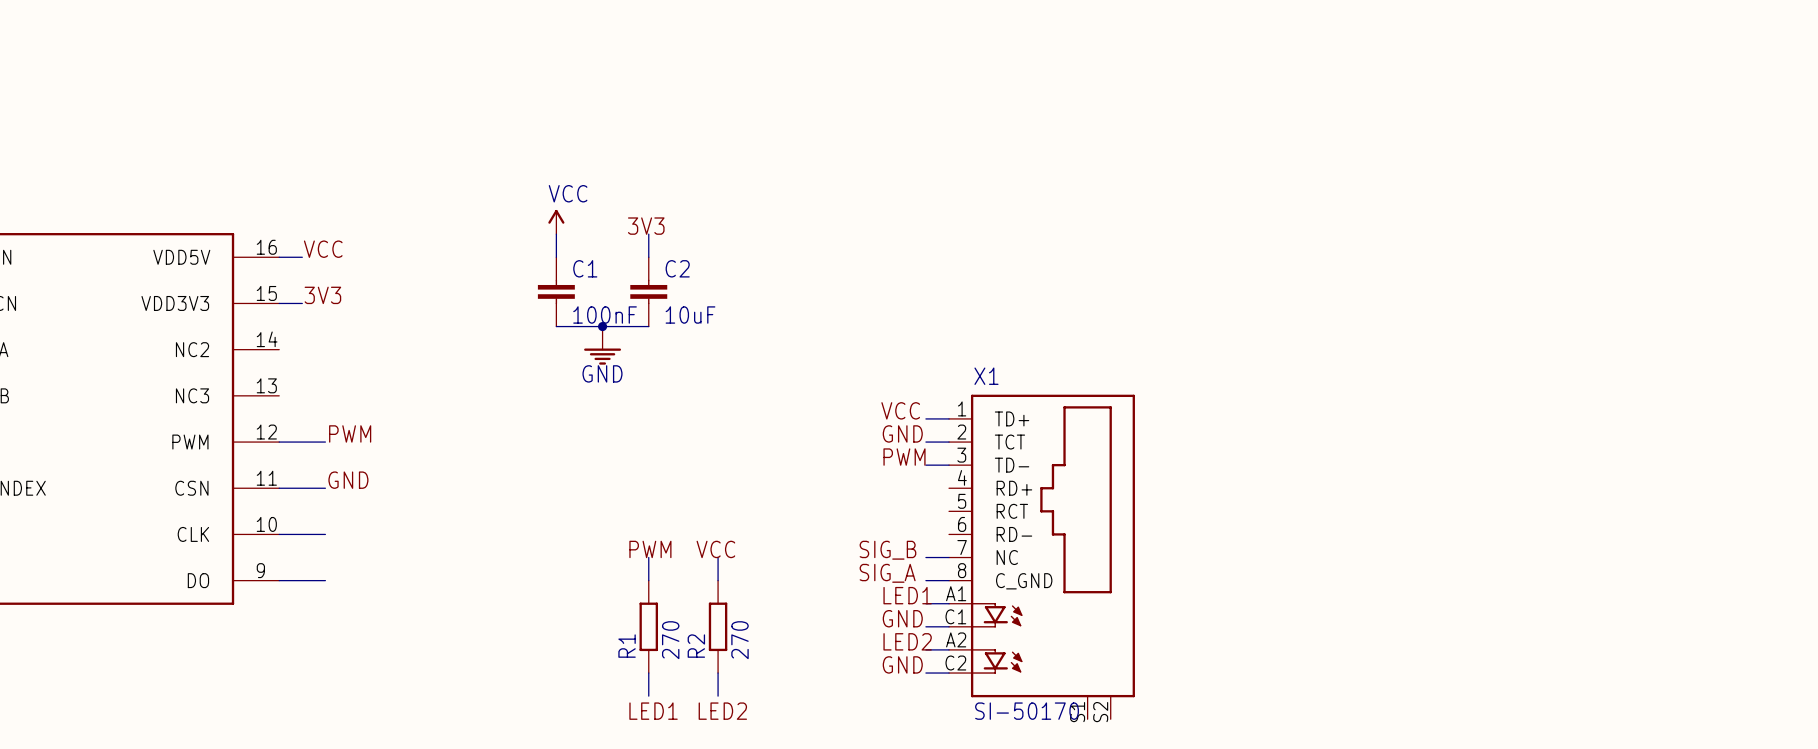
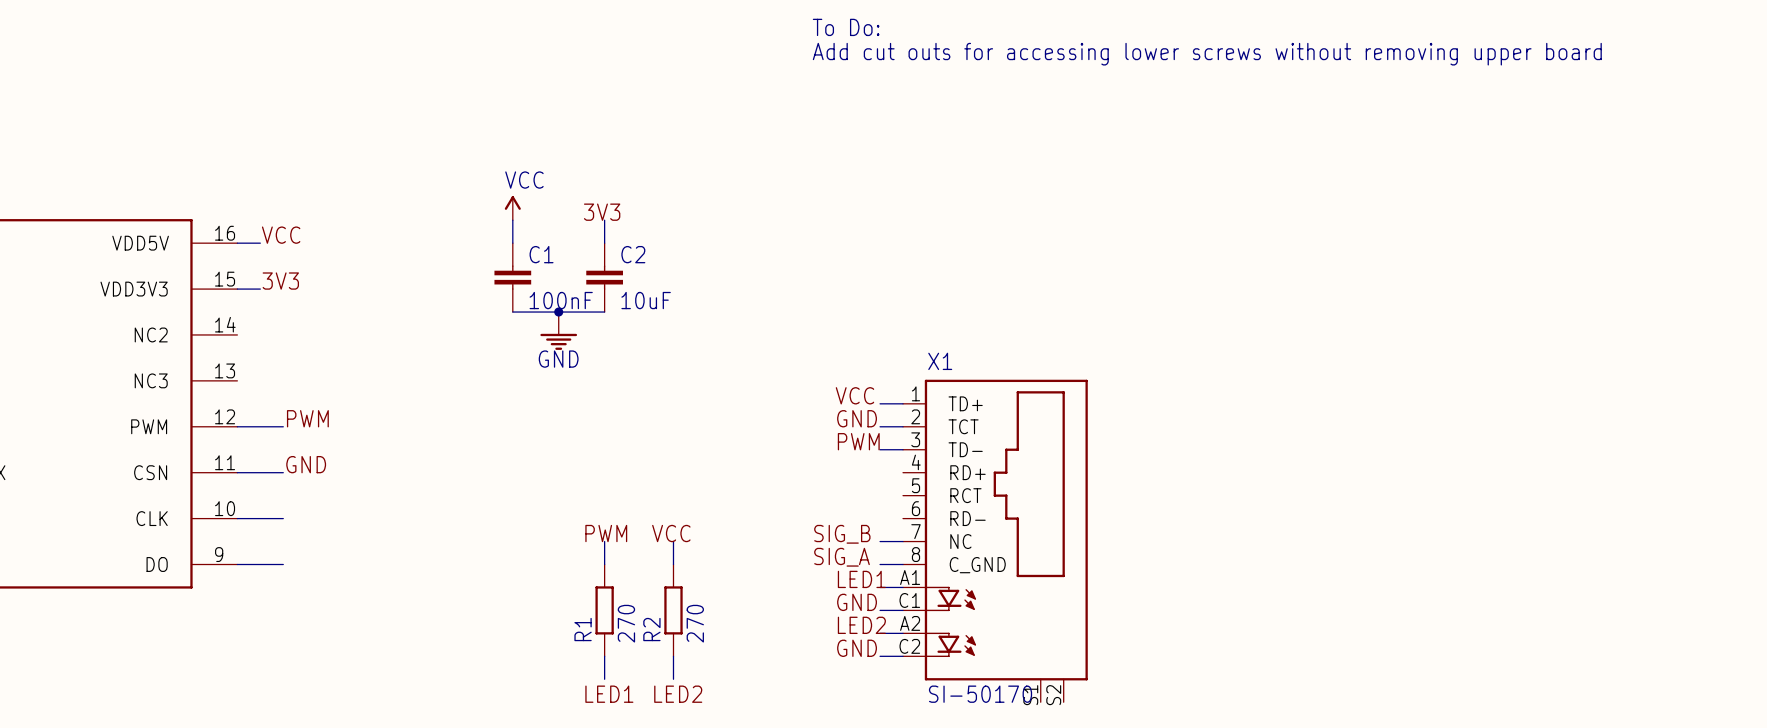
text: none -> To Do: (846, 27)
text: none -> Add cut outs for accessing lower screws without removing upper board (1207, 54)

